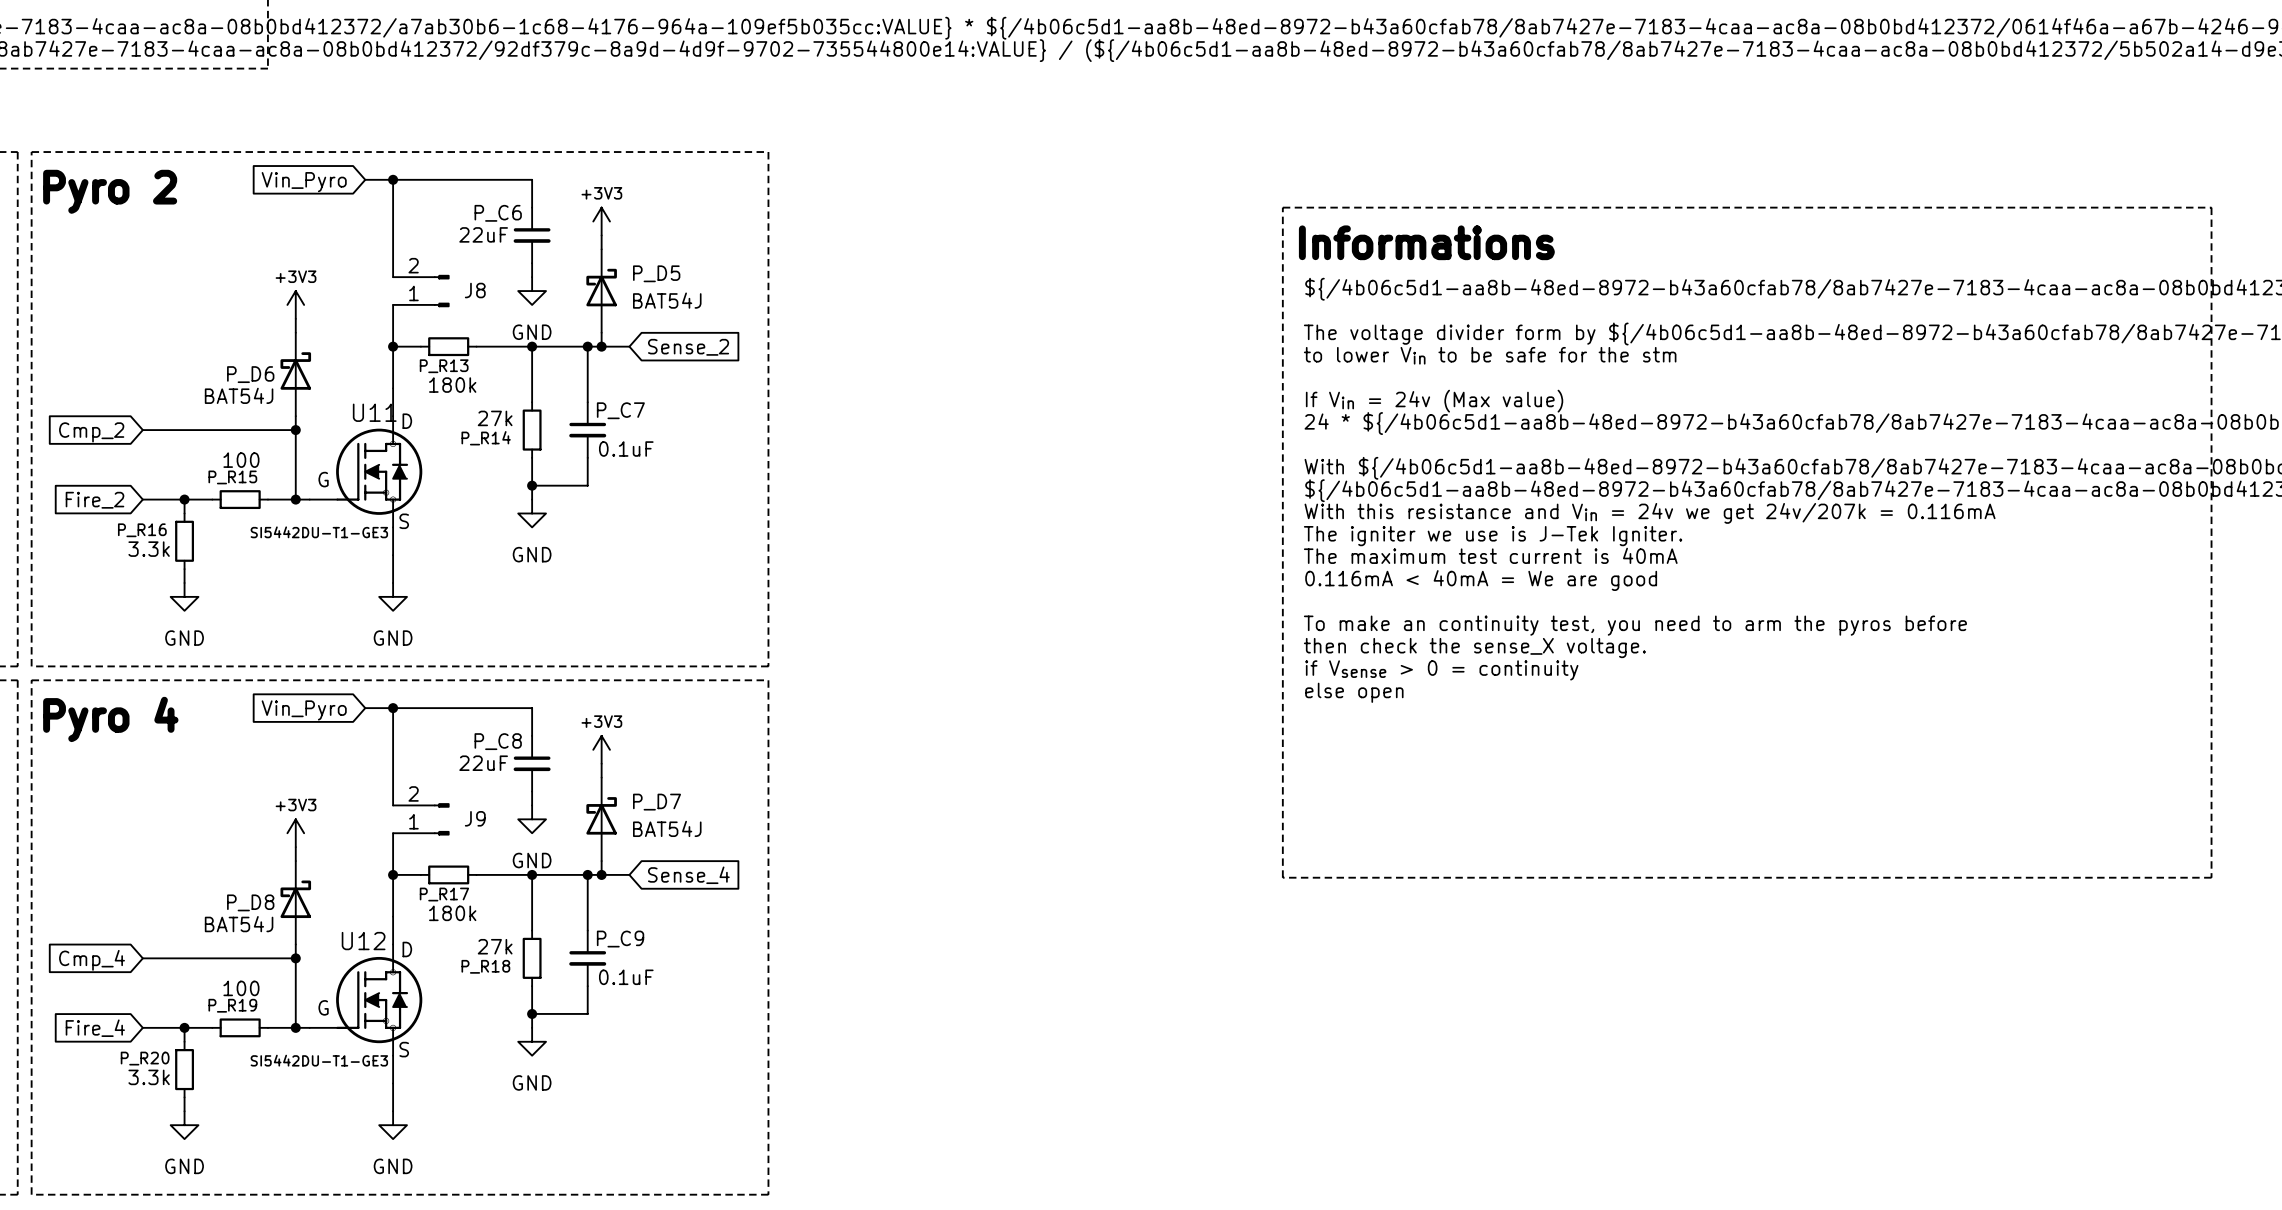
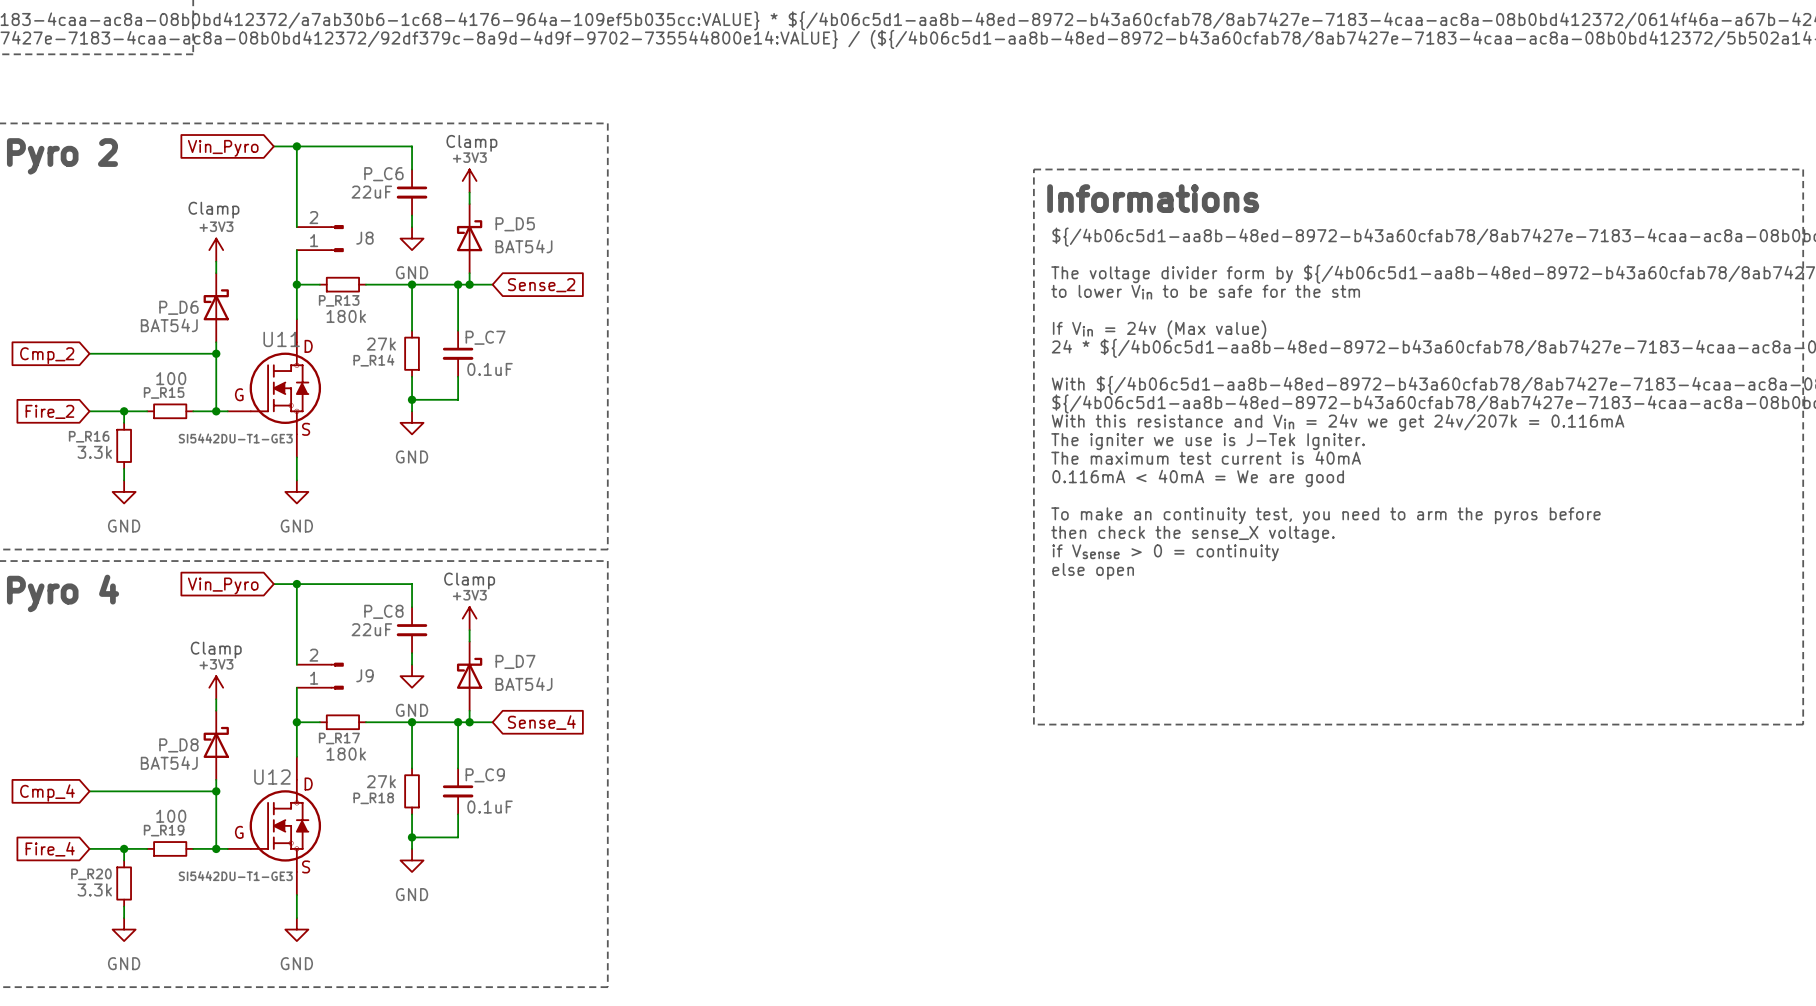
text: none -> Clamp (471, 143)
text: none -> Clamp (213, 210)
text: none -> Clamp (469, 580)
text: none -> Clamp (216, 650)

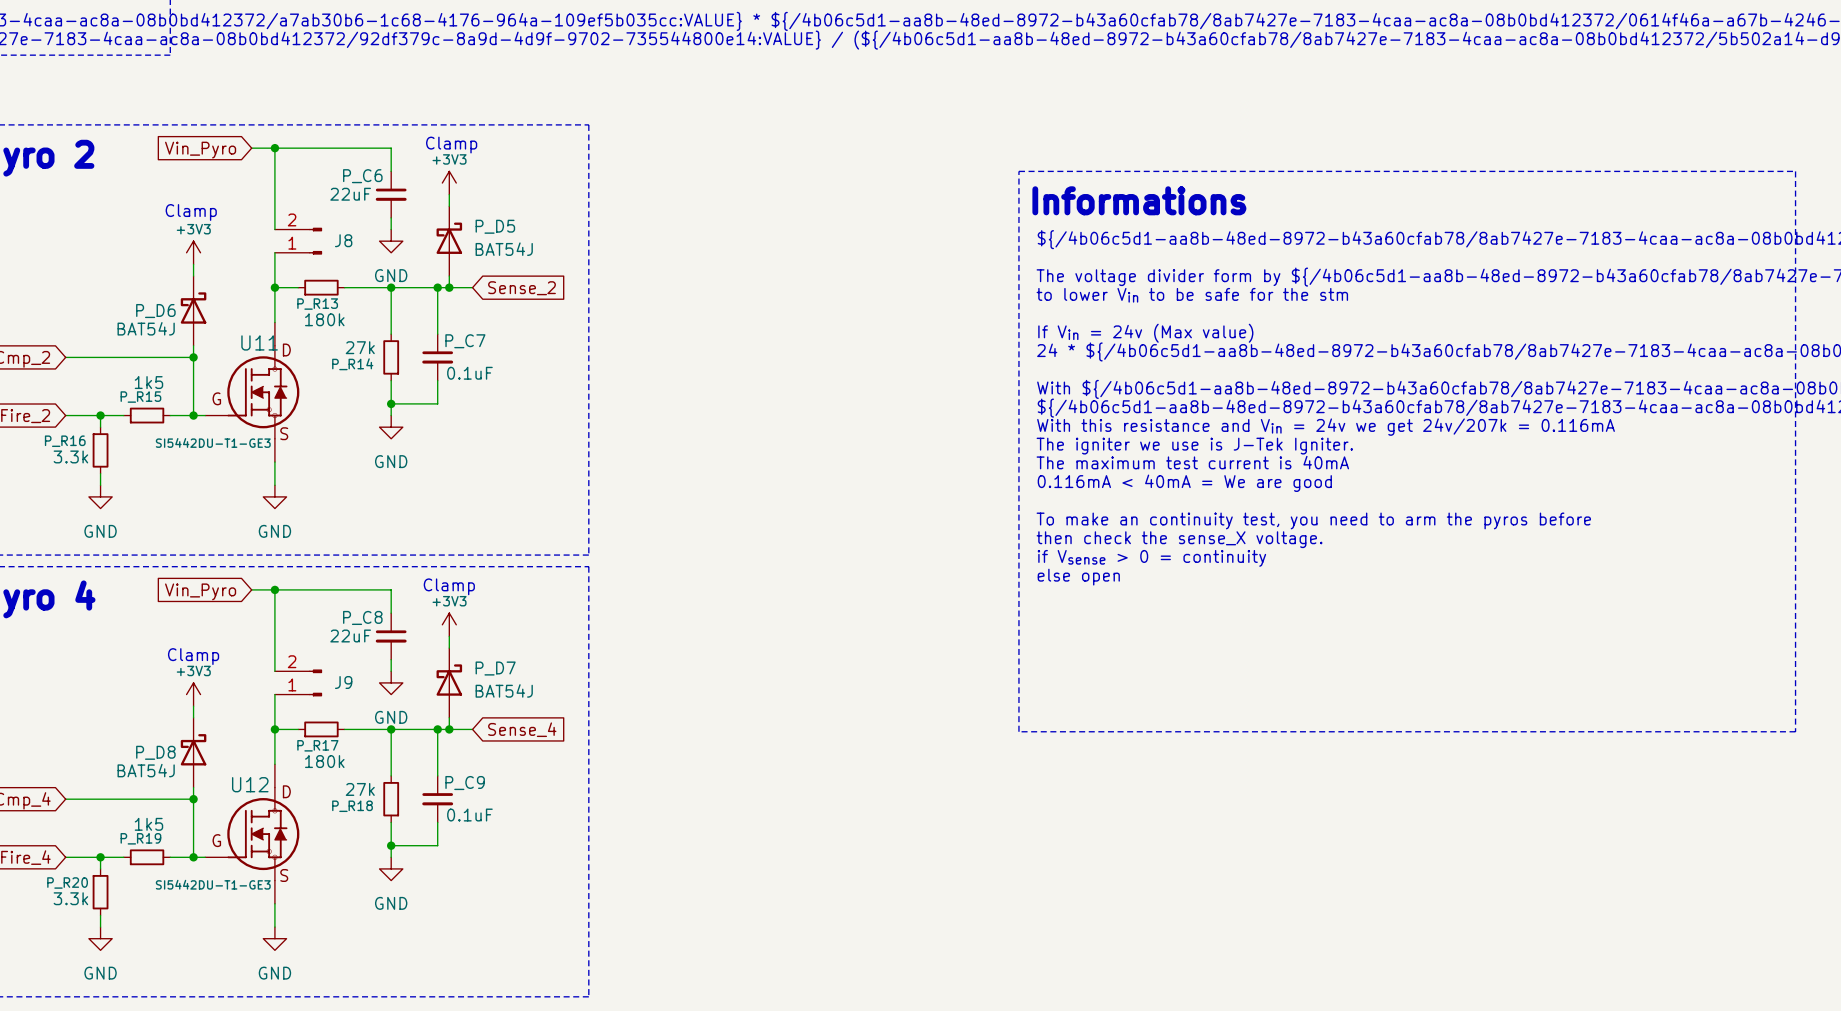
P_R15 value: 100 (171, 378) -> 1k5 (148, 382)
P_R19 value: 100 (171, 816) -> 1k5 (148, 824)

